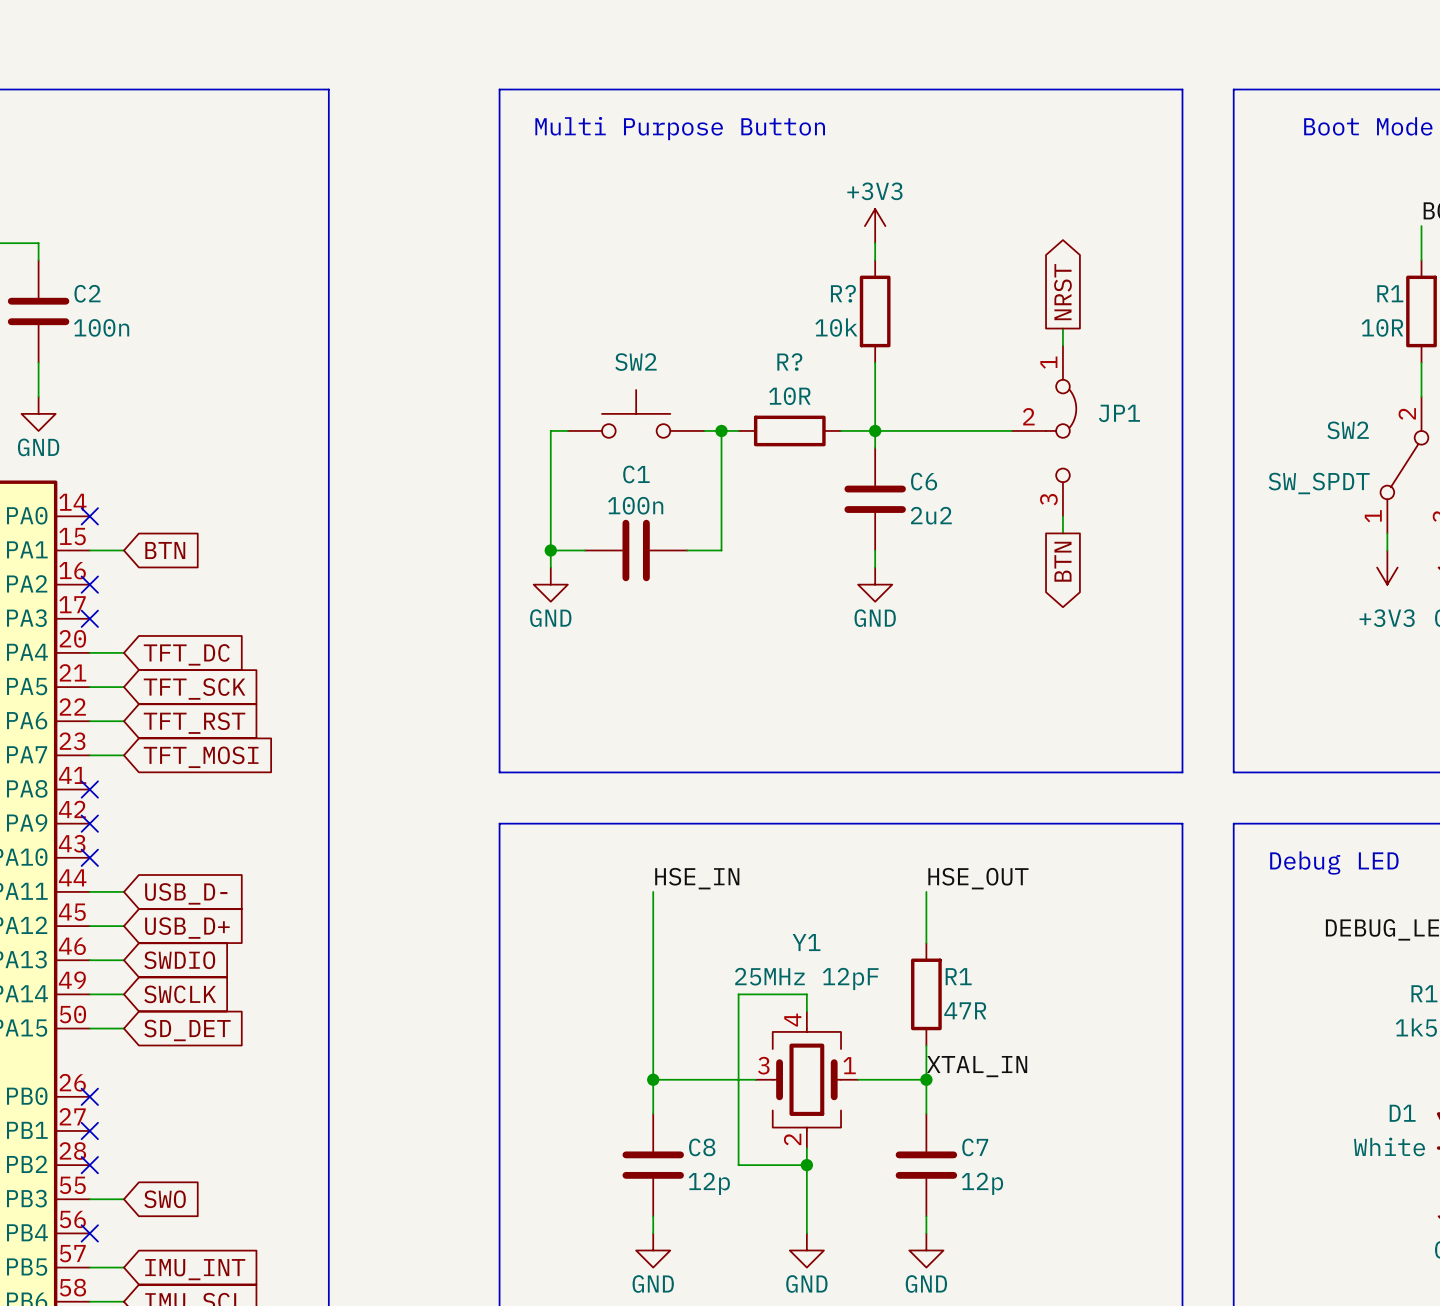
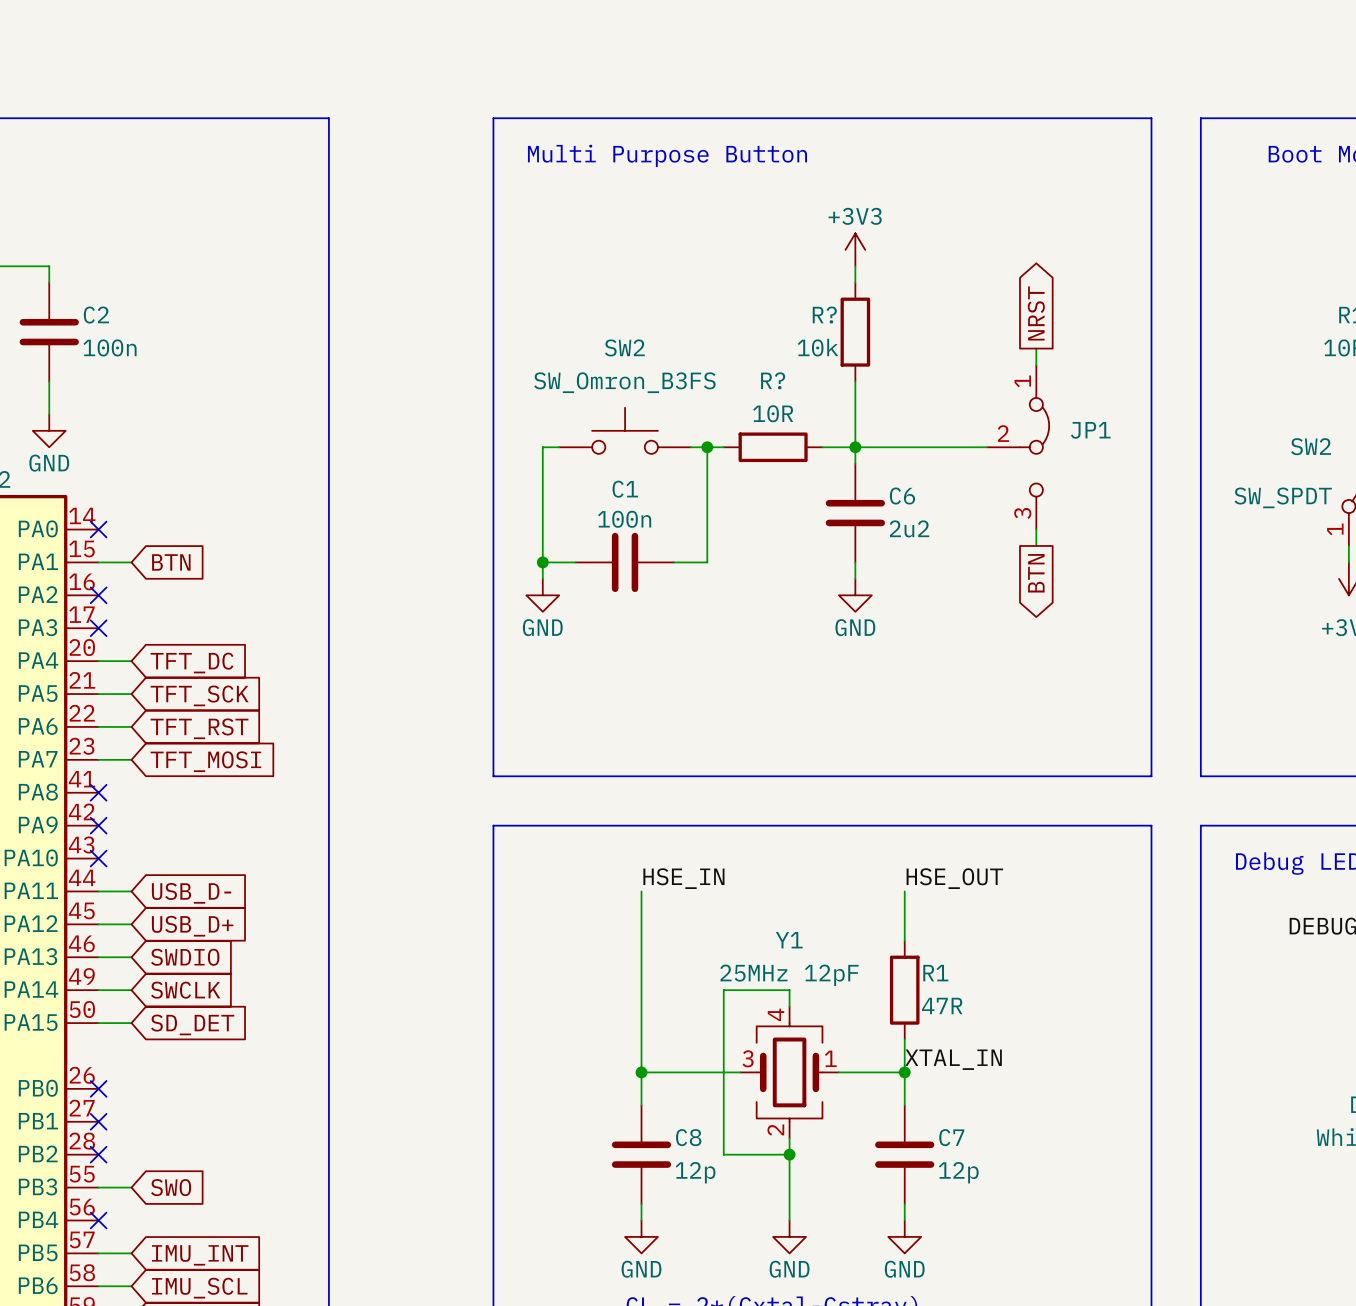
SW2 name position: SW2 (635, 362) -> SW2 (624, 347)
SW2 value: none -> SW_Omron_B3FS (624, 382)

